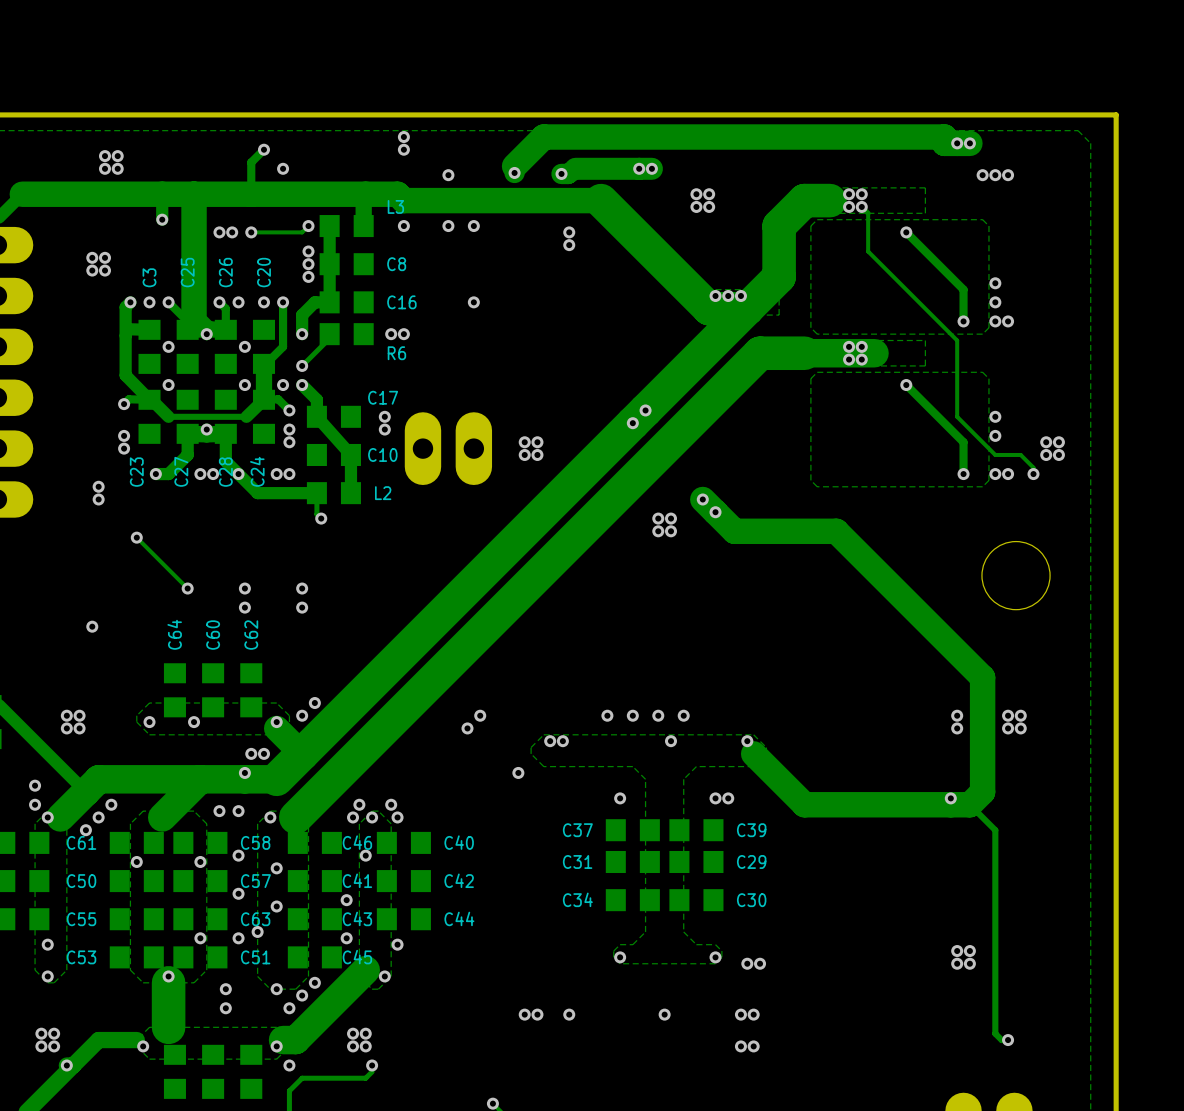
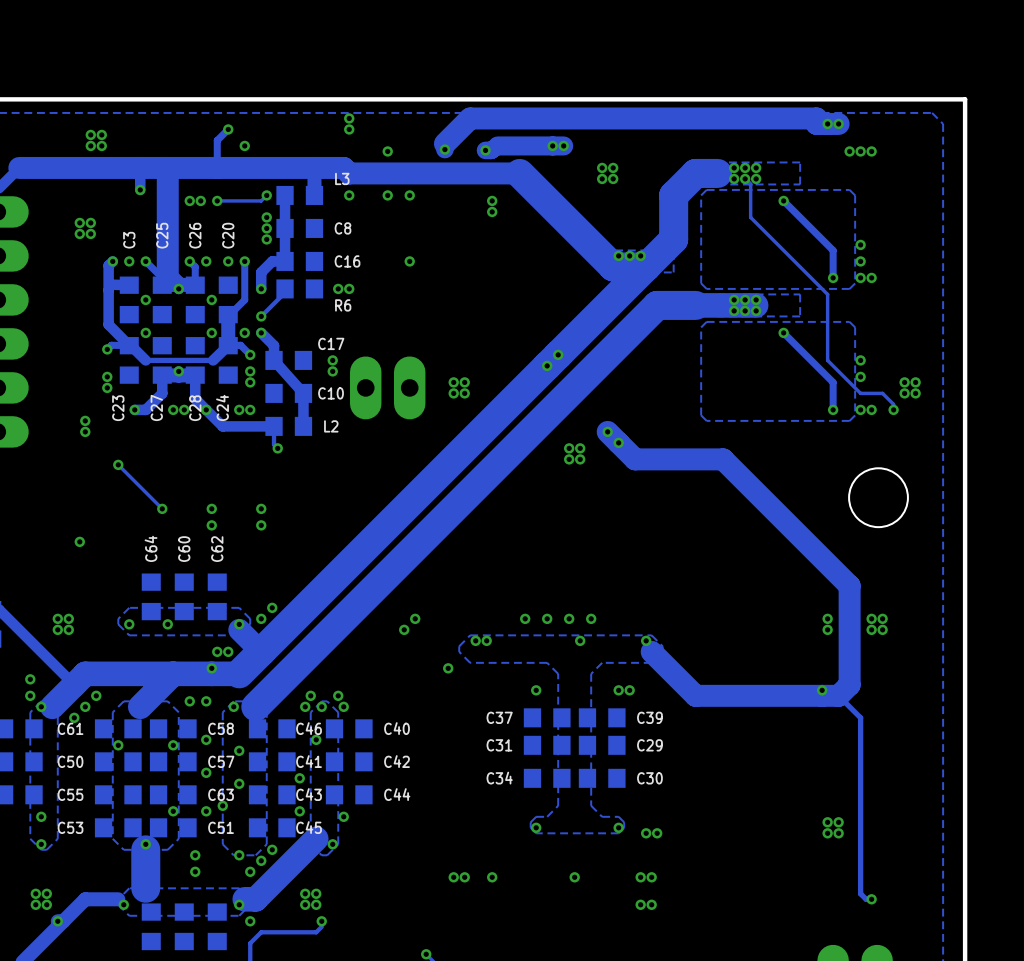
via: none -> (756, 167)
via: none -> (756, 178)
via: none -> (756, 299)
via: none -> (756, 310)

